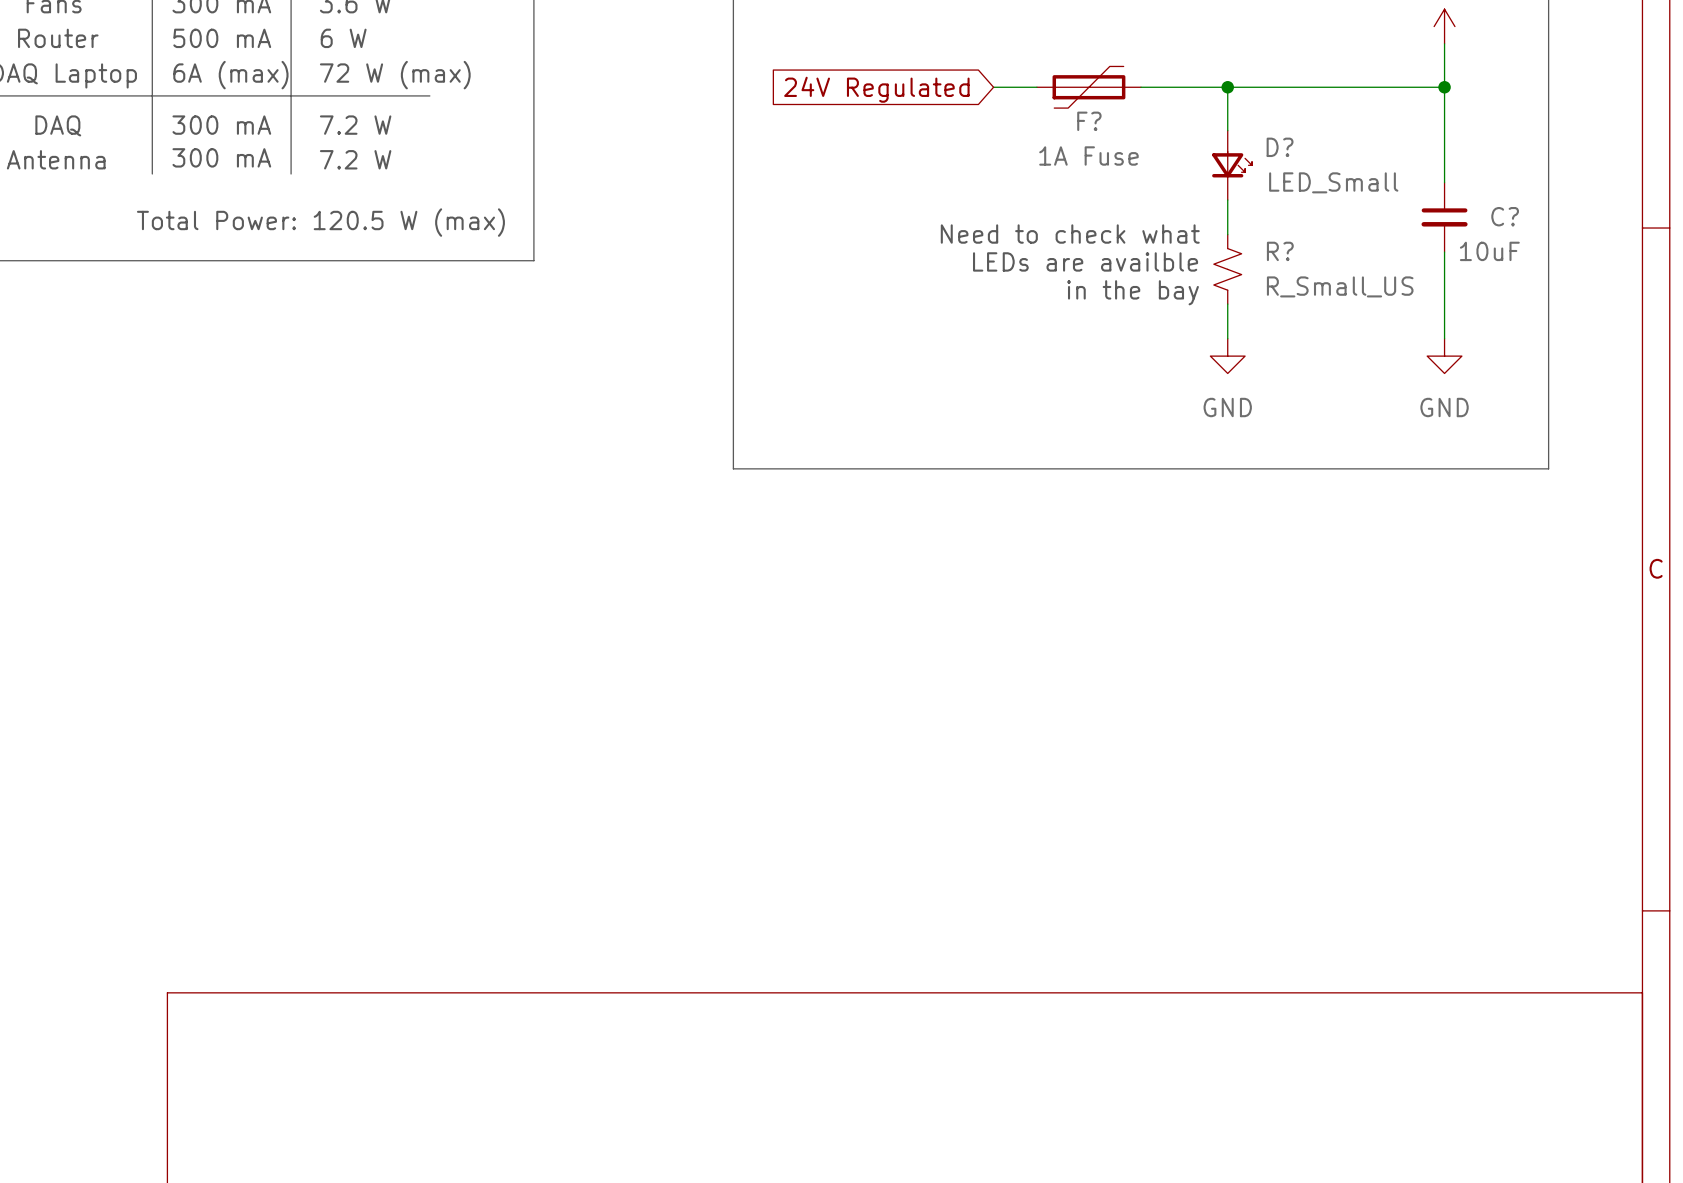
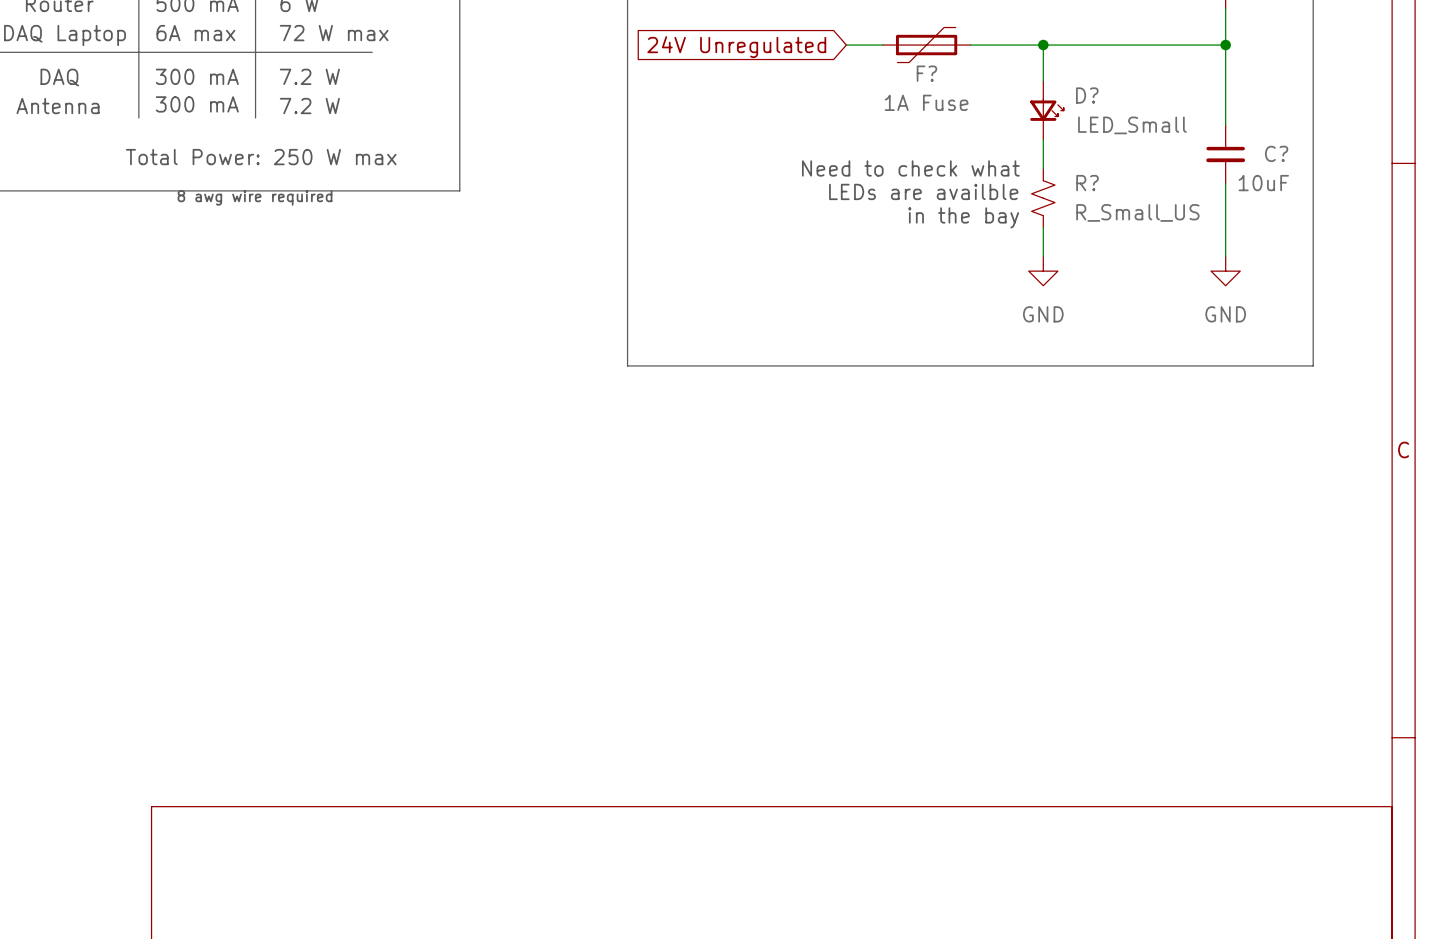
text: 6A (max) (230, 75) -> 6A max (195, 33)
text: 72 W (max) (395, 75) -> 72 W max (334, 33)
global label: 24V Regulated (876, 89) -> 24V Unregulated (736, 47)
text: Total Power: 120.5 W (max) (320, 222) -> Total Power: 250 W max (261, 157)
text: none -> 8 awg wire required (254, 197)

